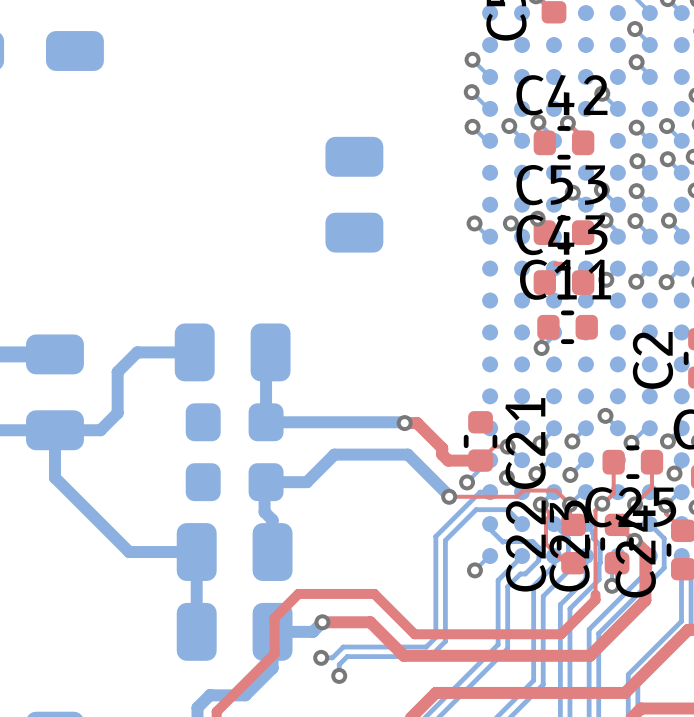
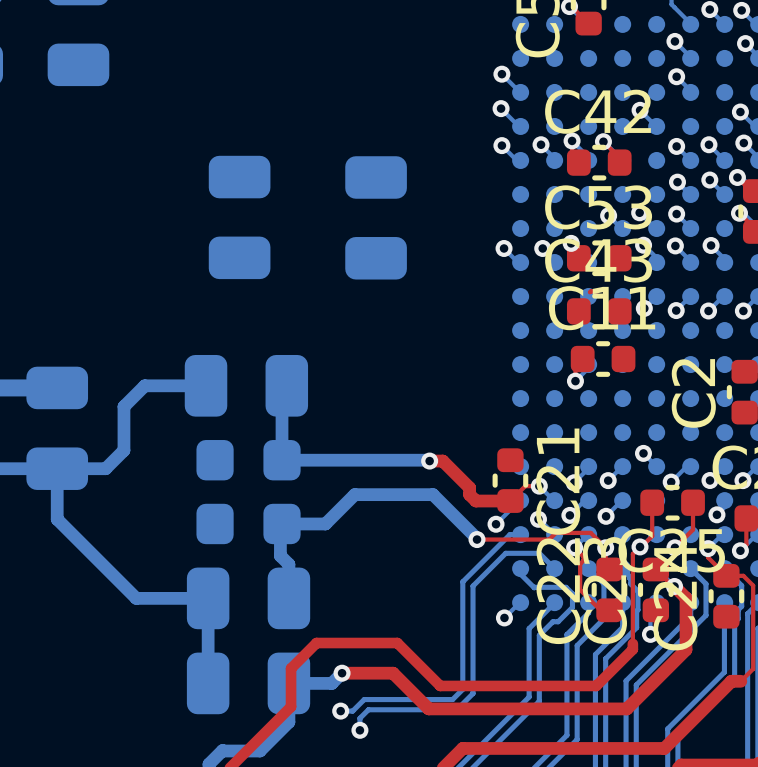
part: none -> (239, 217)

